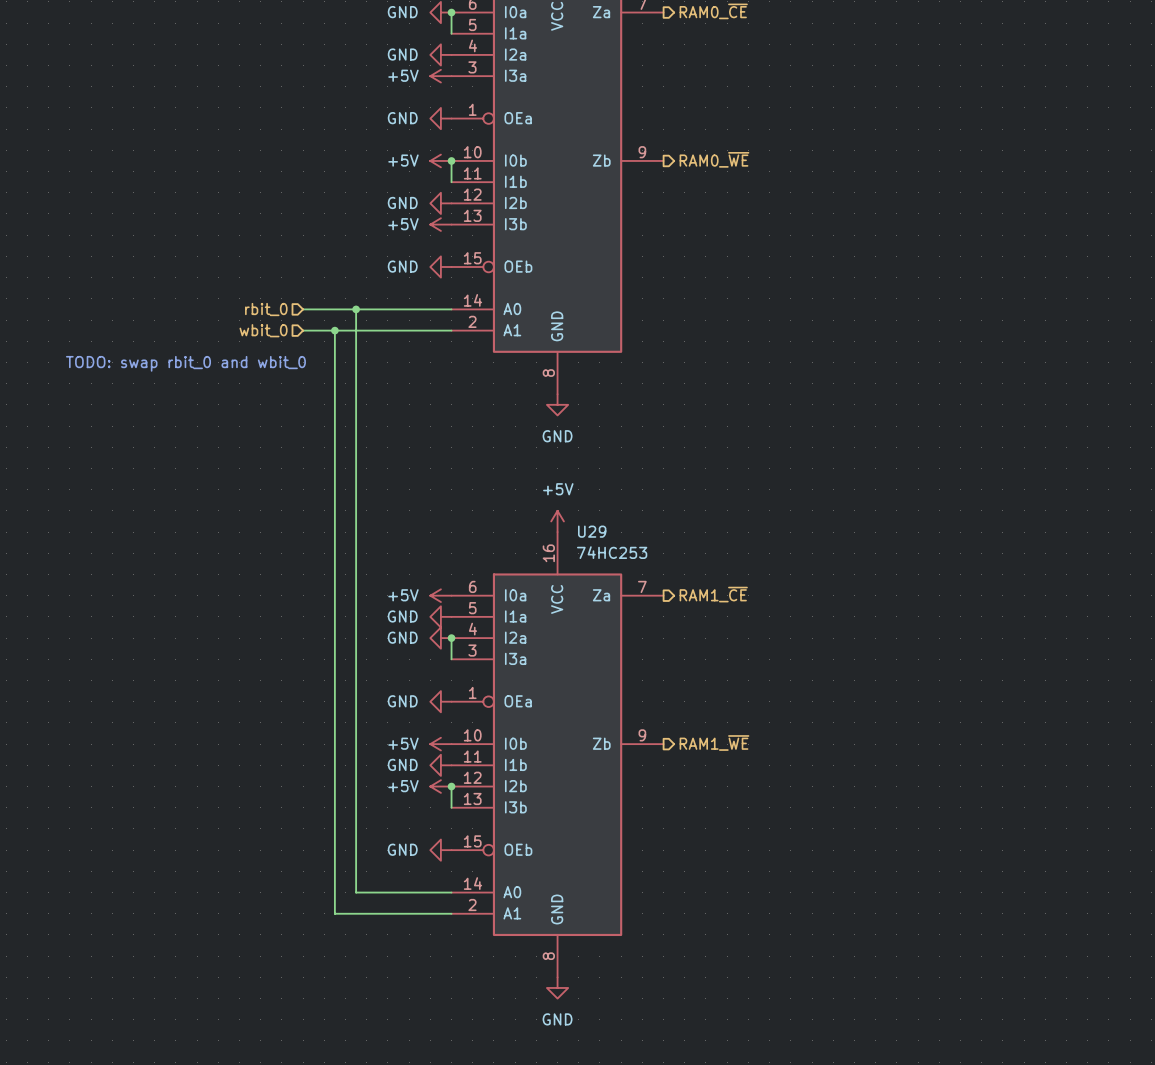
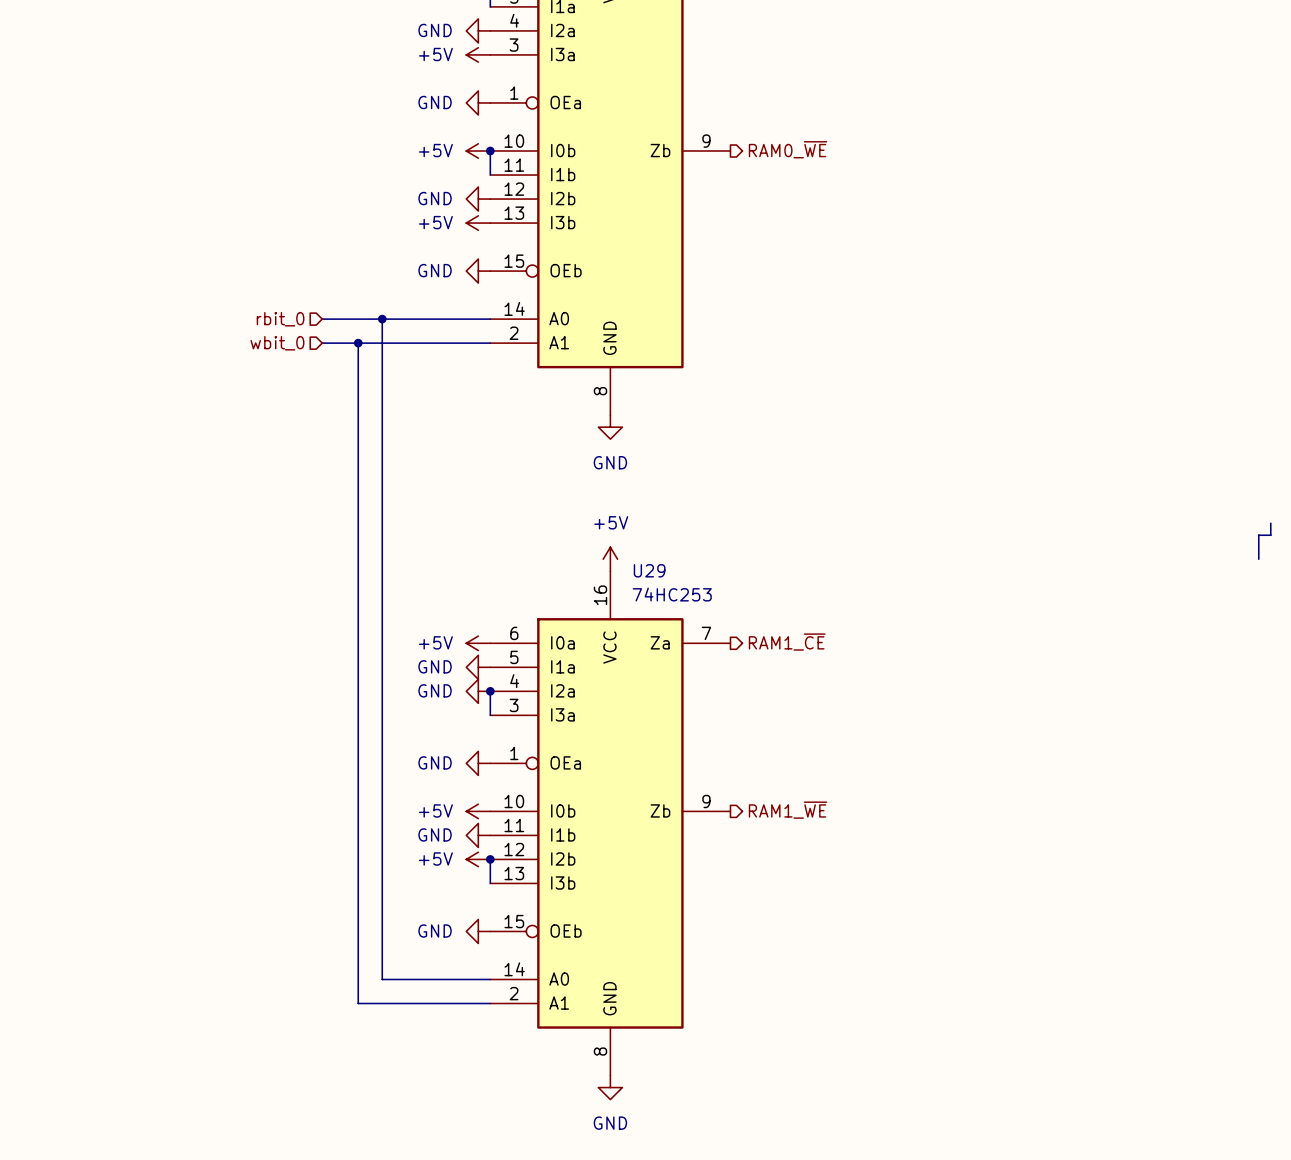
text: TODO: swap rbit_0 and wbit_0 (185, 363) -> none
wire: none -> (1270, 523) (1270, 535) (1258, 535) (1258, 559)

